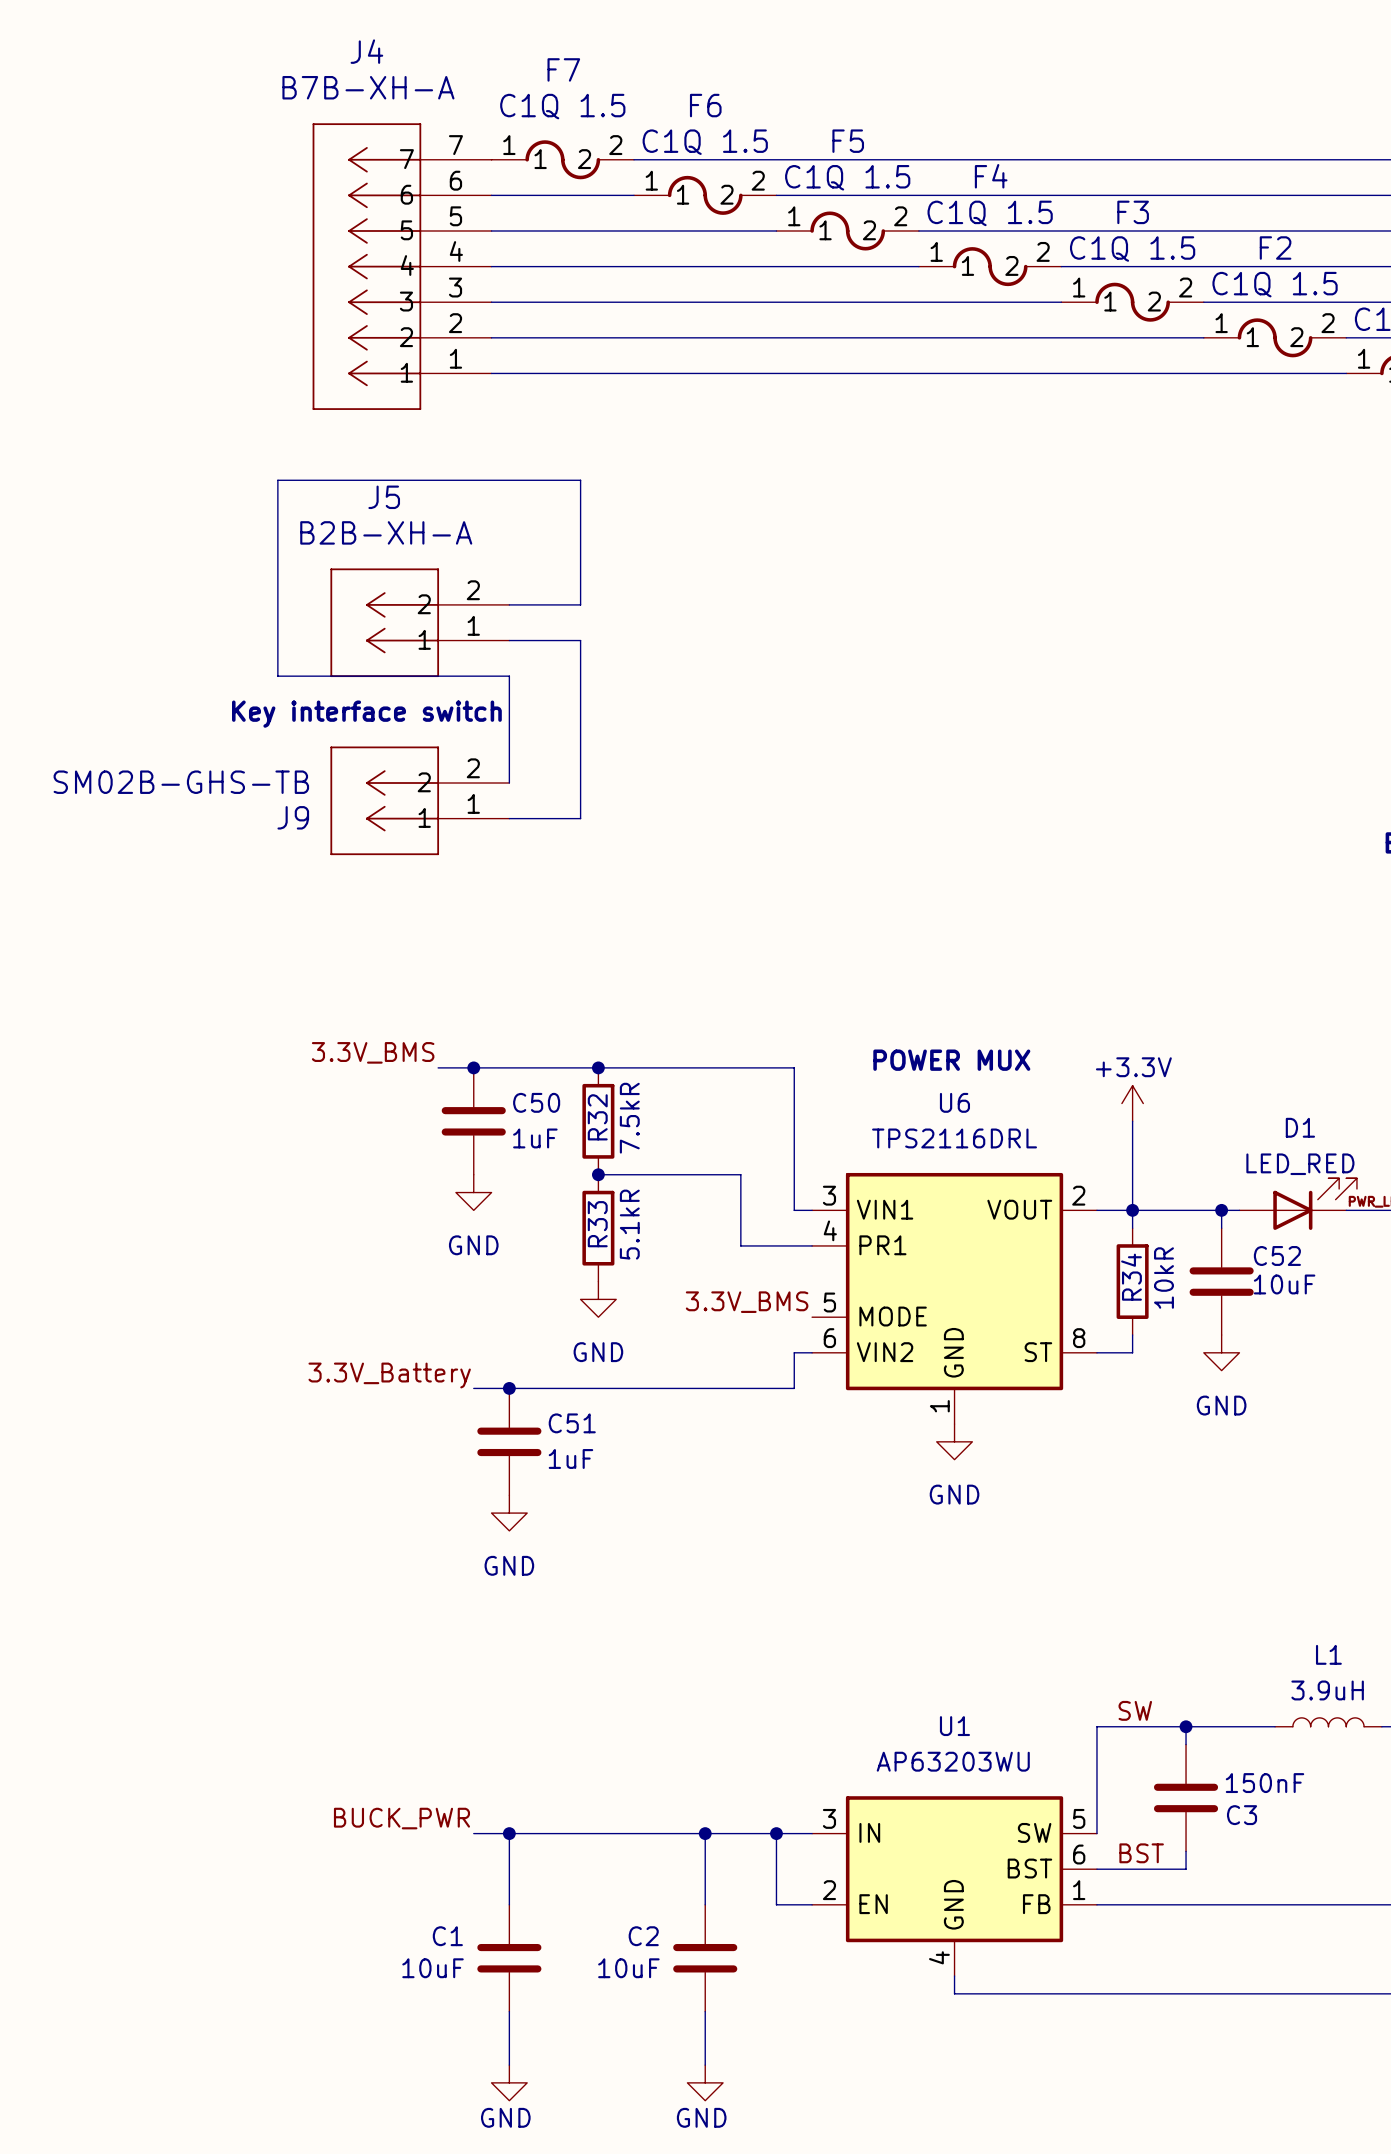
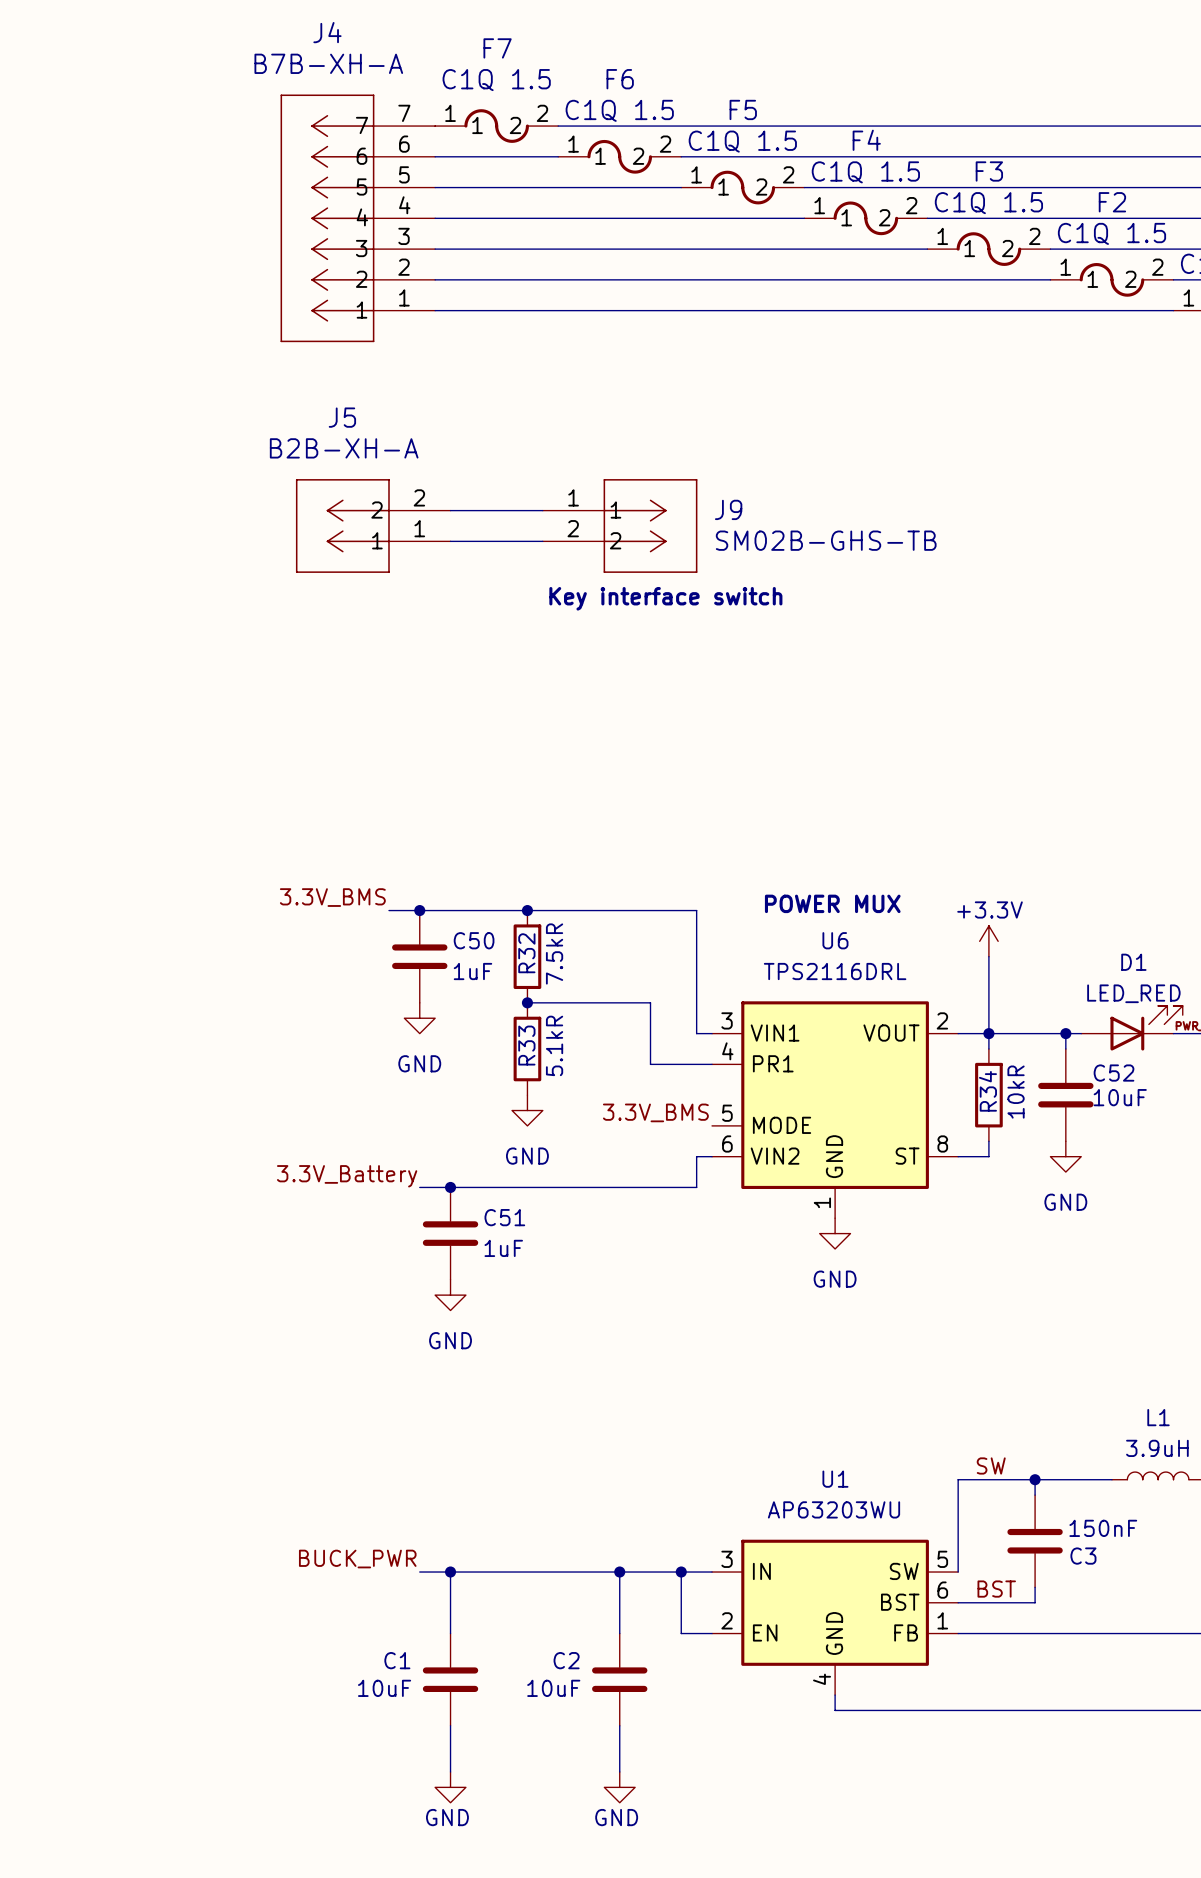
wire: (580, 604) (580, 480) (277, 480) (277, 676) (509, 676) (509, 783) -> (512, 510) (542, 510)
wire: (580, 640) (580, 818) (509, 818) -> (512, 541) (542, 541)
text: none -> Key interface switch (665, 598)
text: Key interface switch (366, 714) -> none
J9 rotation: 0° (384, 800) -> 180° (650, 525)
J9 position: (419, 800) -> (620, 525)

